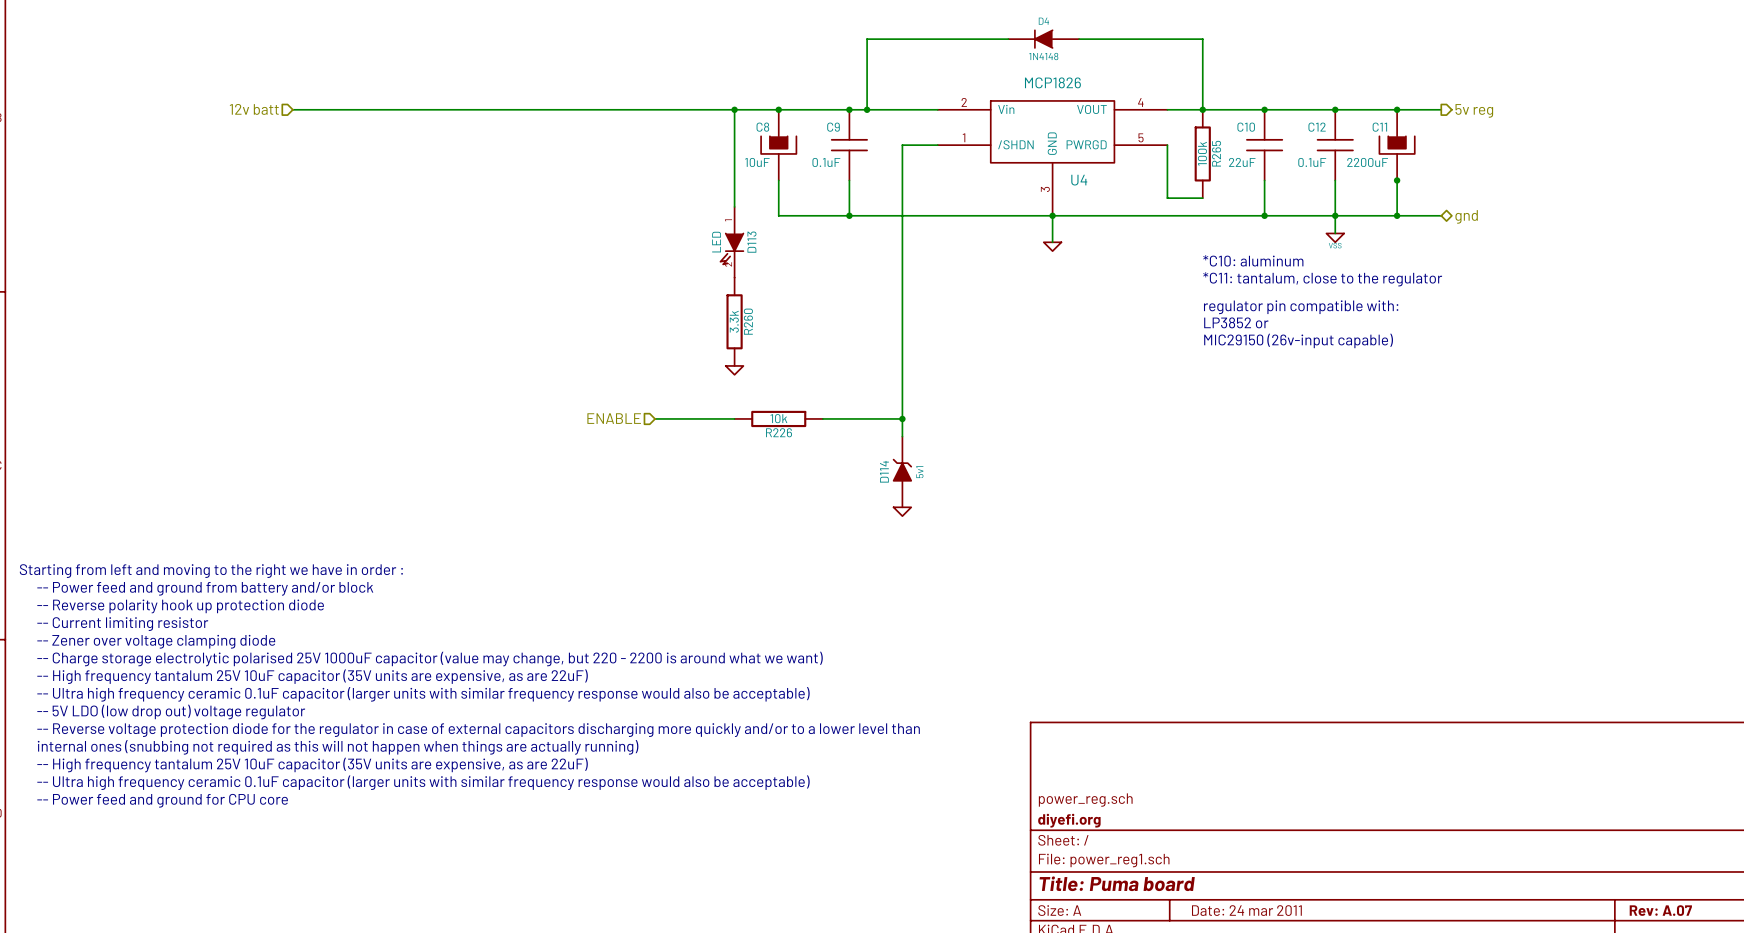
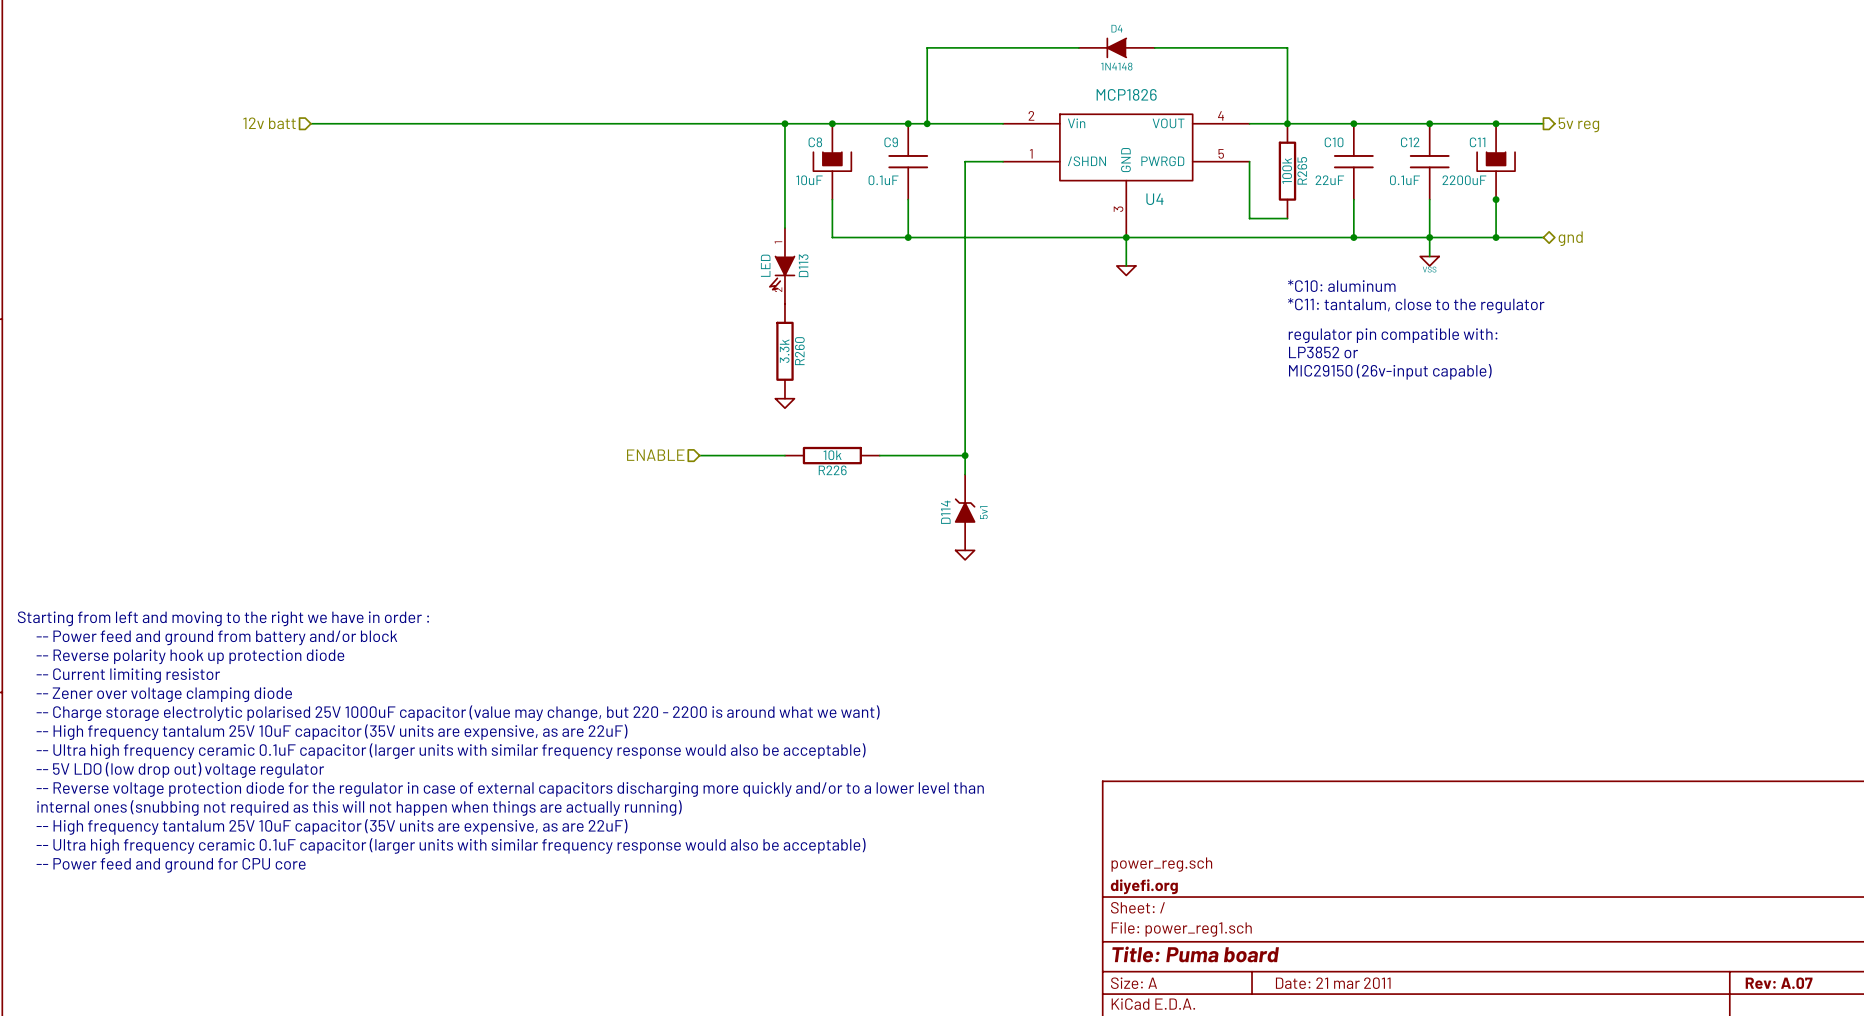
title block: Date: 24 mar 2011 (1246, 910) -> Date: 21 mar 2011 (1333, 983)

